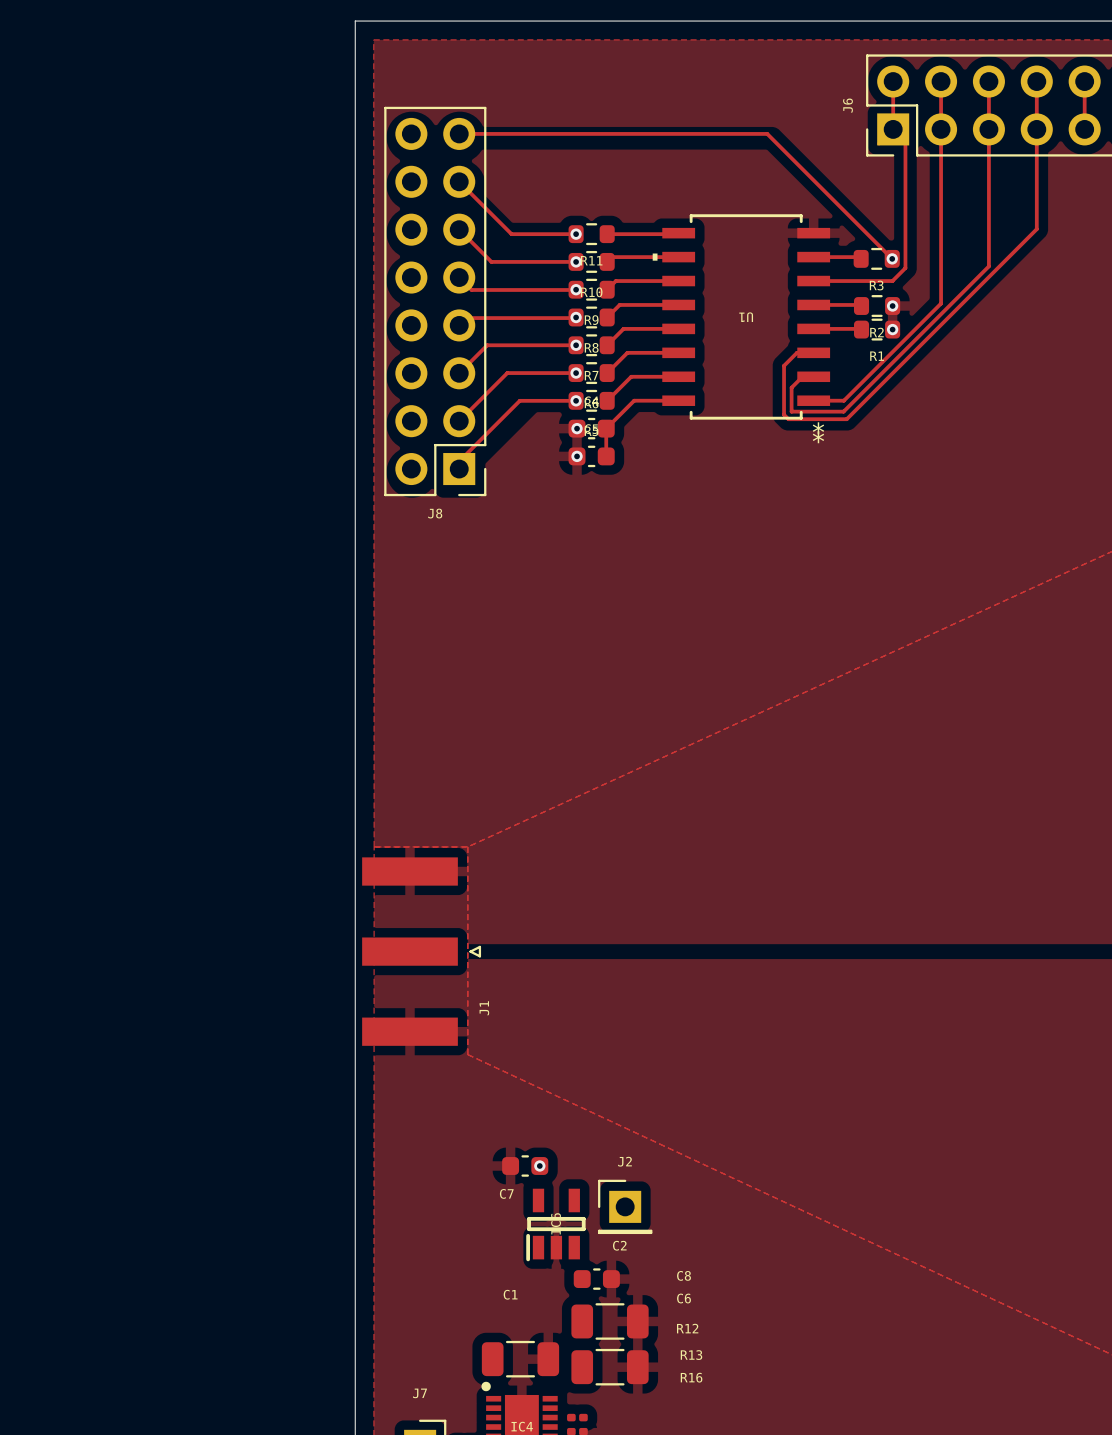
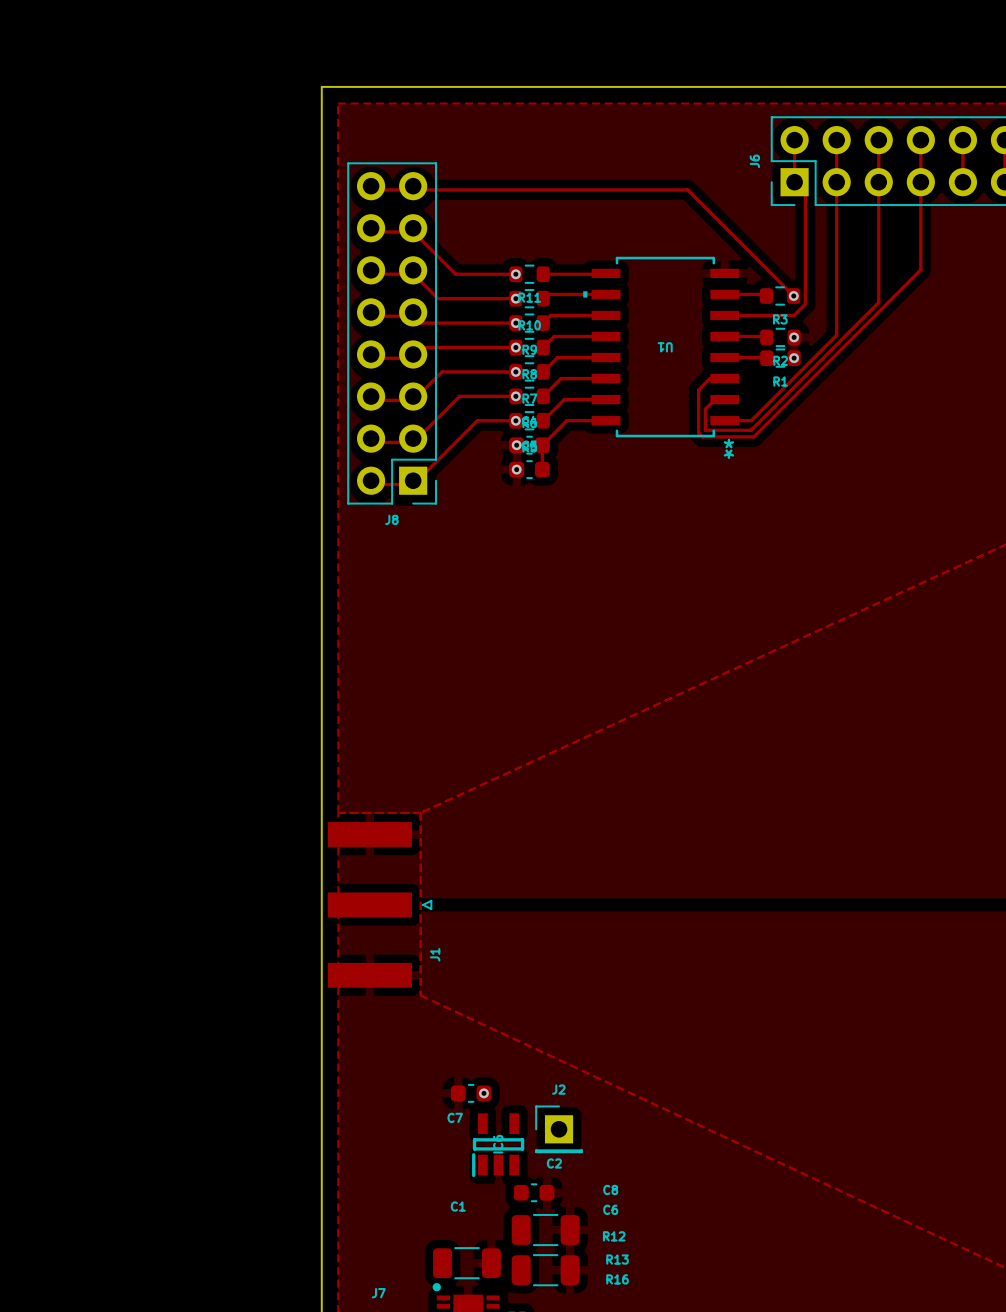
track: (459, 133) (767, 133) (771, 138) -> (371, 189) (687, 189)
track: (459, 181) (511, 234) -> (371, 232) (413, 232) (455, 274) (459, 274)
track: (459, 229) (491, 261) -> (371, 274) (413, 274) (438, 298) (441, 298)
track: (459, 277) (471, 289) (576, 289) -> (371, 316) (413, 316) (420, 323) (515, 323)
track: (576, 317) (466, 318) (459, 325) -> (515, 347) (424, 347) (413, 358) (371, 358)
track: (492, 345) (487, 345) (459, 373) -> (442, 371) (413, 400) (371, 400)
track: (512, 373) (507, 373) (459, 421) -> (459, 396) (413, 442) (371, 442)
track: (532, 400) (519, 400) (459, 461) (459, 469) -> (477, 420) (413, 484) (371, 484)

